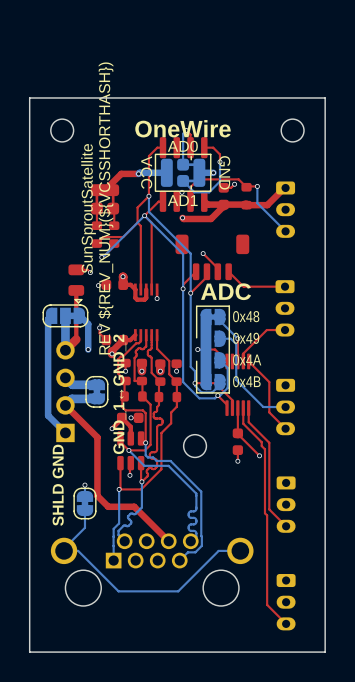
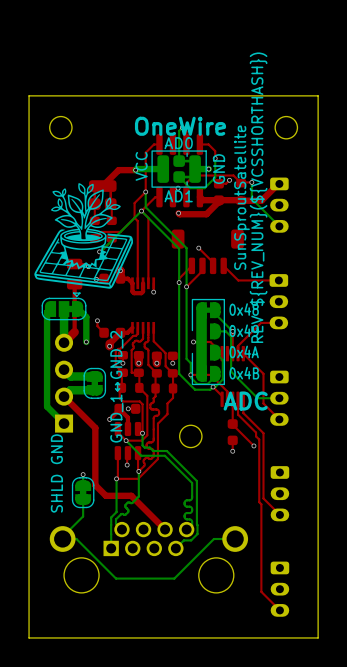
part footprint: [154, 153, 212, 192] -> [151, 150, 207, 188]
drawing: none -> [34, 183, 133, 289]
text position: SunSproutSatellite (88, 208) -> SunSproutSatellite (242, 197)
text position: REV ${REV_NUM}(${VCSSHORTHASH}) (105, 208) -> REV ${REV_NUM}(${VCSSHORTHASH}) (258, 197)
text position: ADC (226, 291) -> ADC (245, 401)

